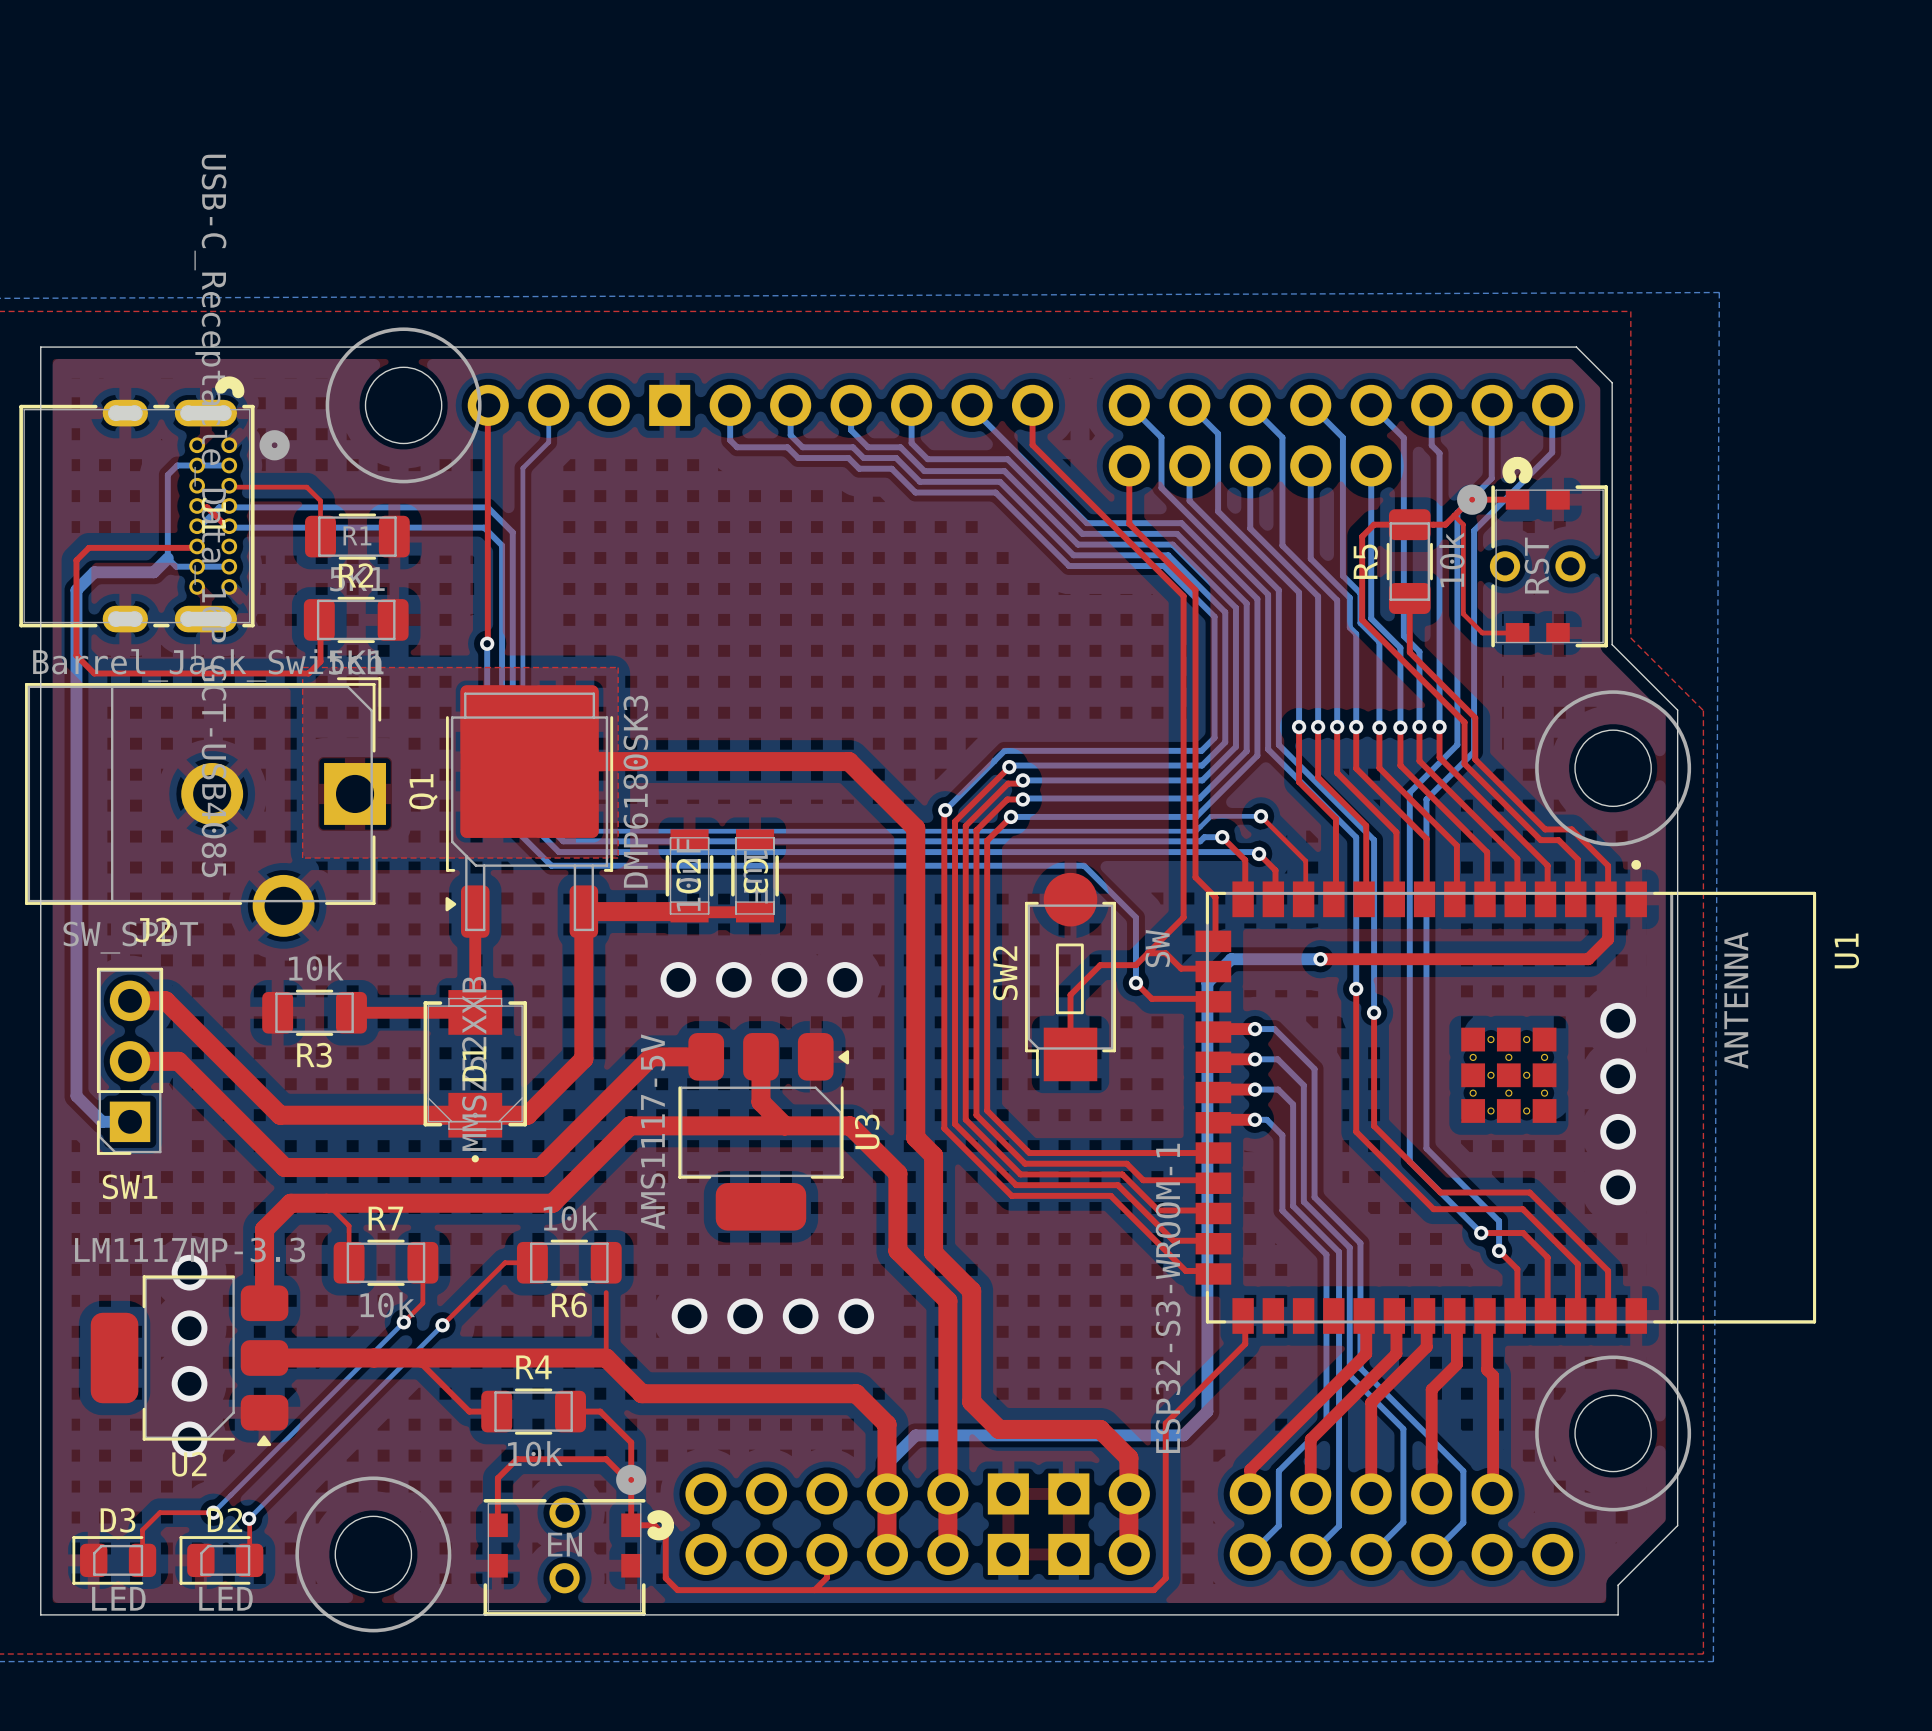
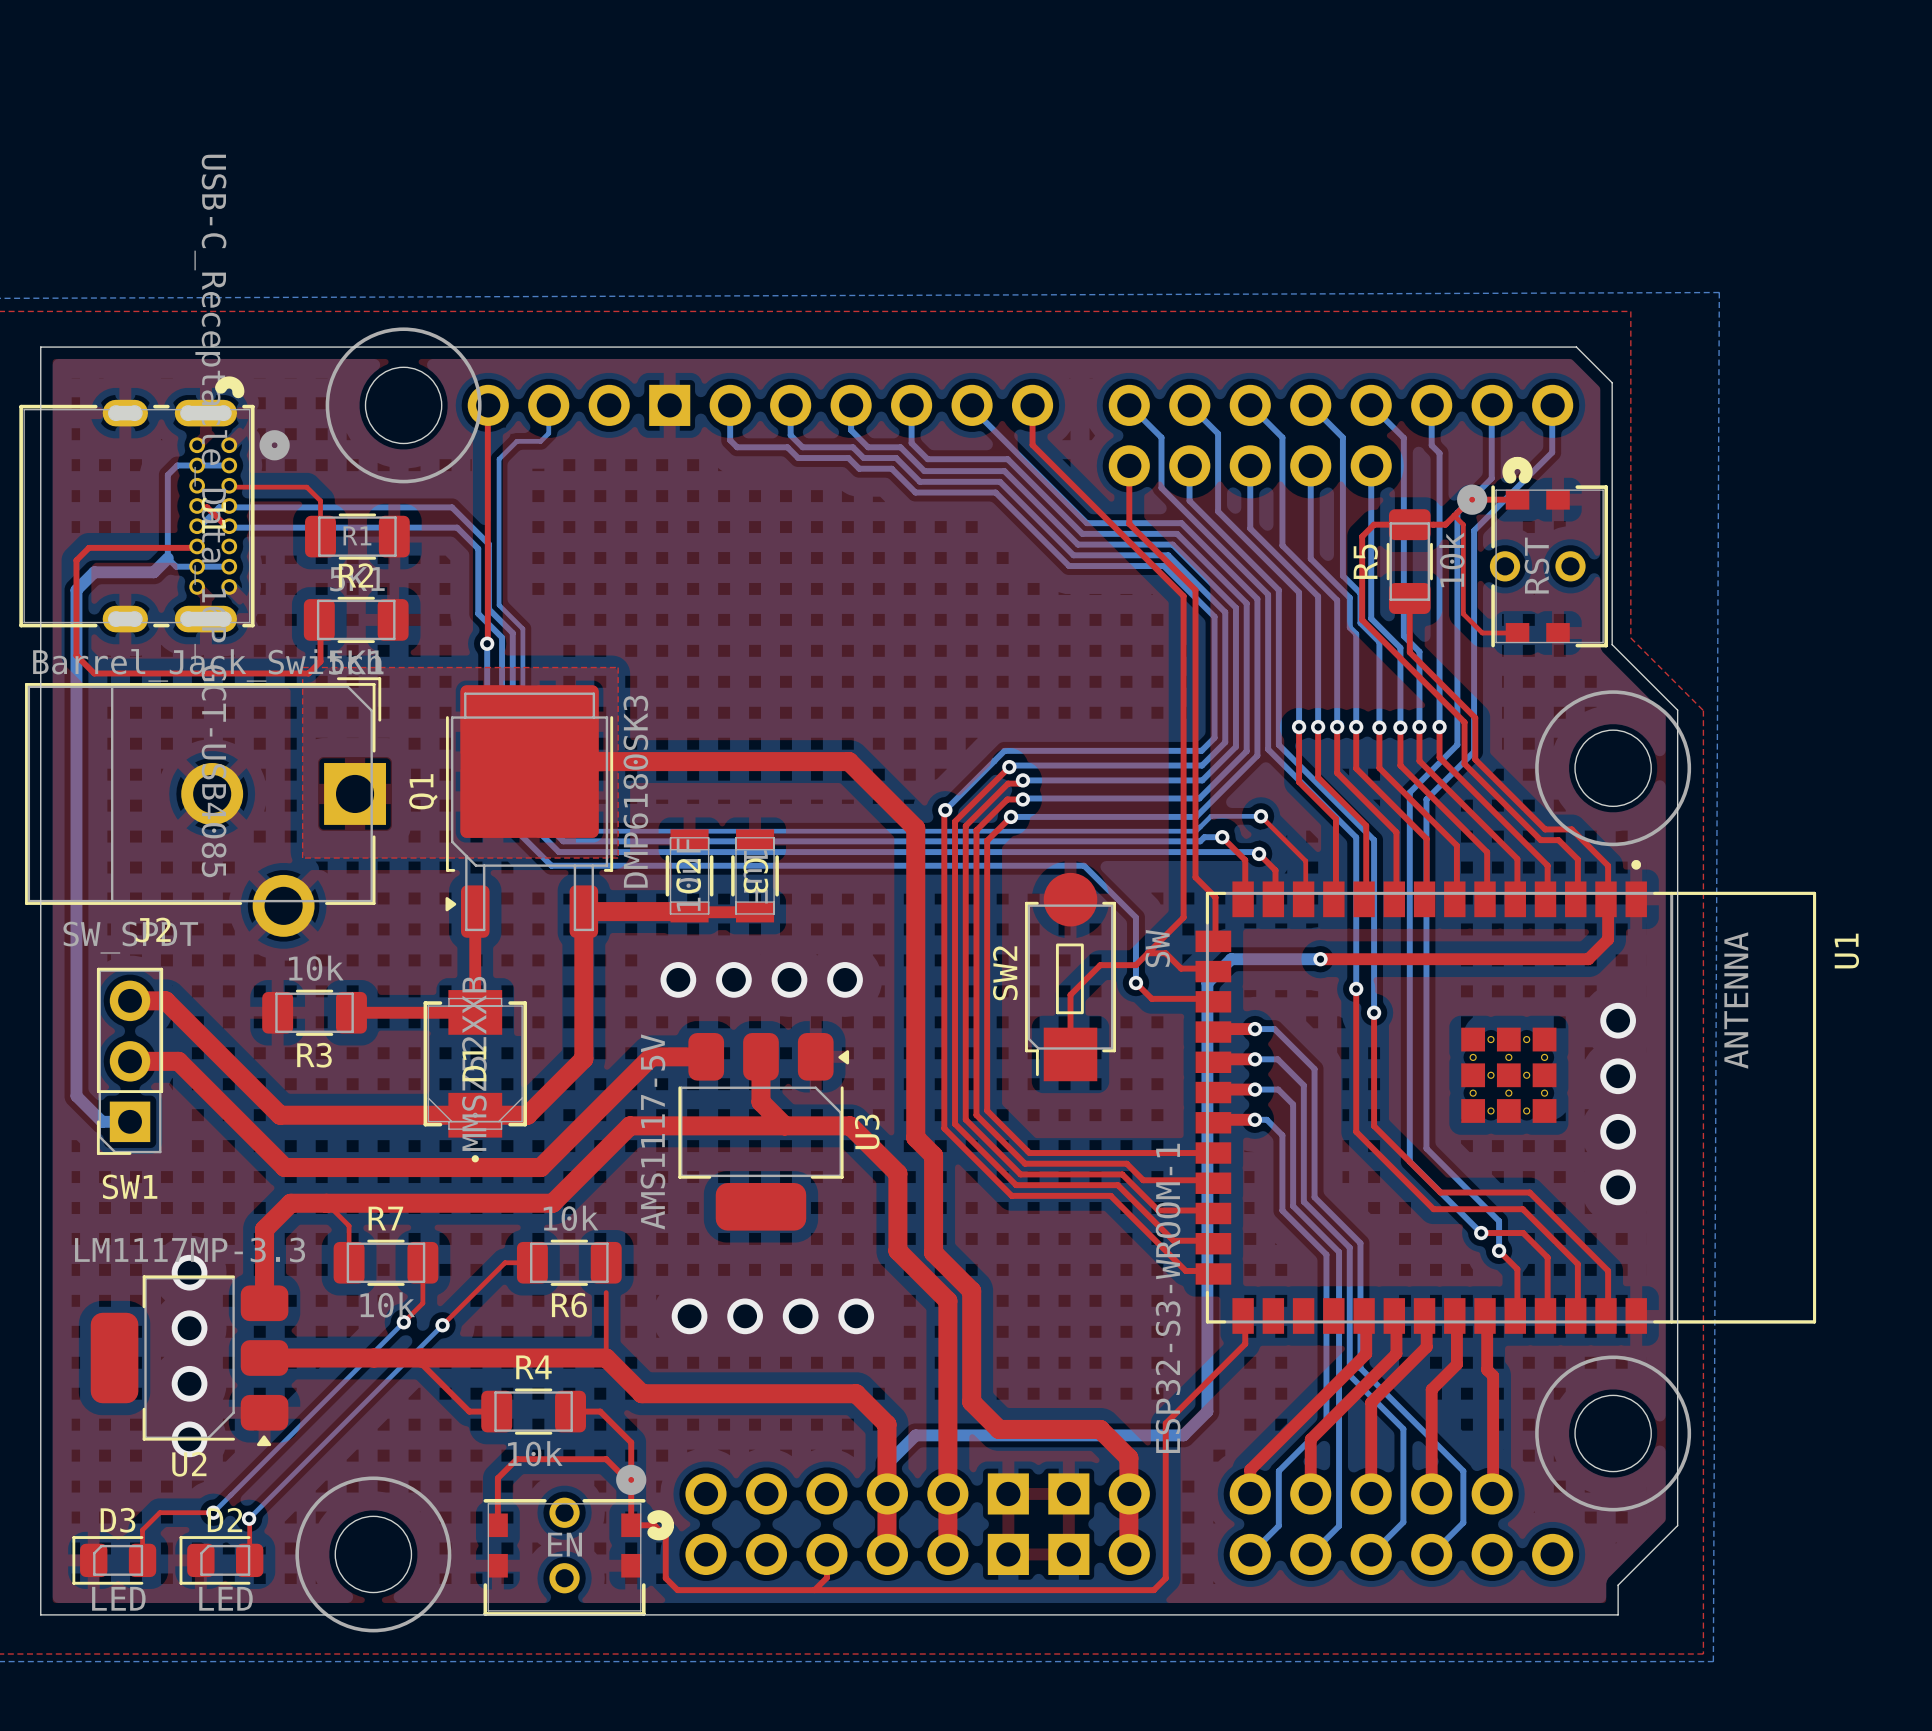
bottom track: (548, 433) (548, 442) (522, 468) (522, 628) -> (548, 433) (540, 441) (516, 441) (499, 459) (499, 605) (522, 628)
bottom track: (452, 507) (487, 507) (512, 532) (512, 633) -> (452, 507) (488, 544) (488, 609) (512, 633)
bottom track: (457, 527) (484, 527) (502, 545) (502, 637) -> (457, 527) (478, 548) (478, 613) (502, 637)

